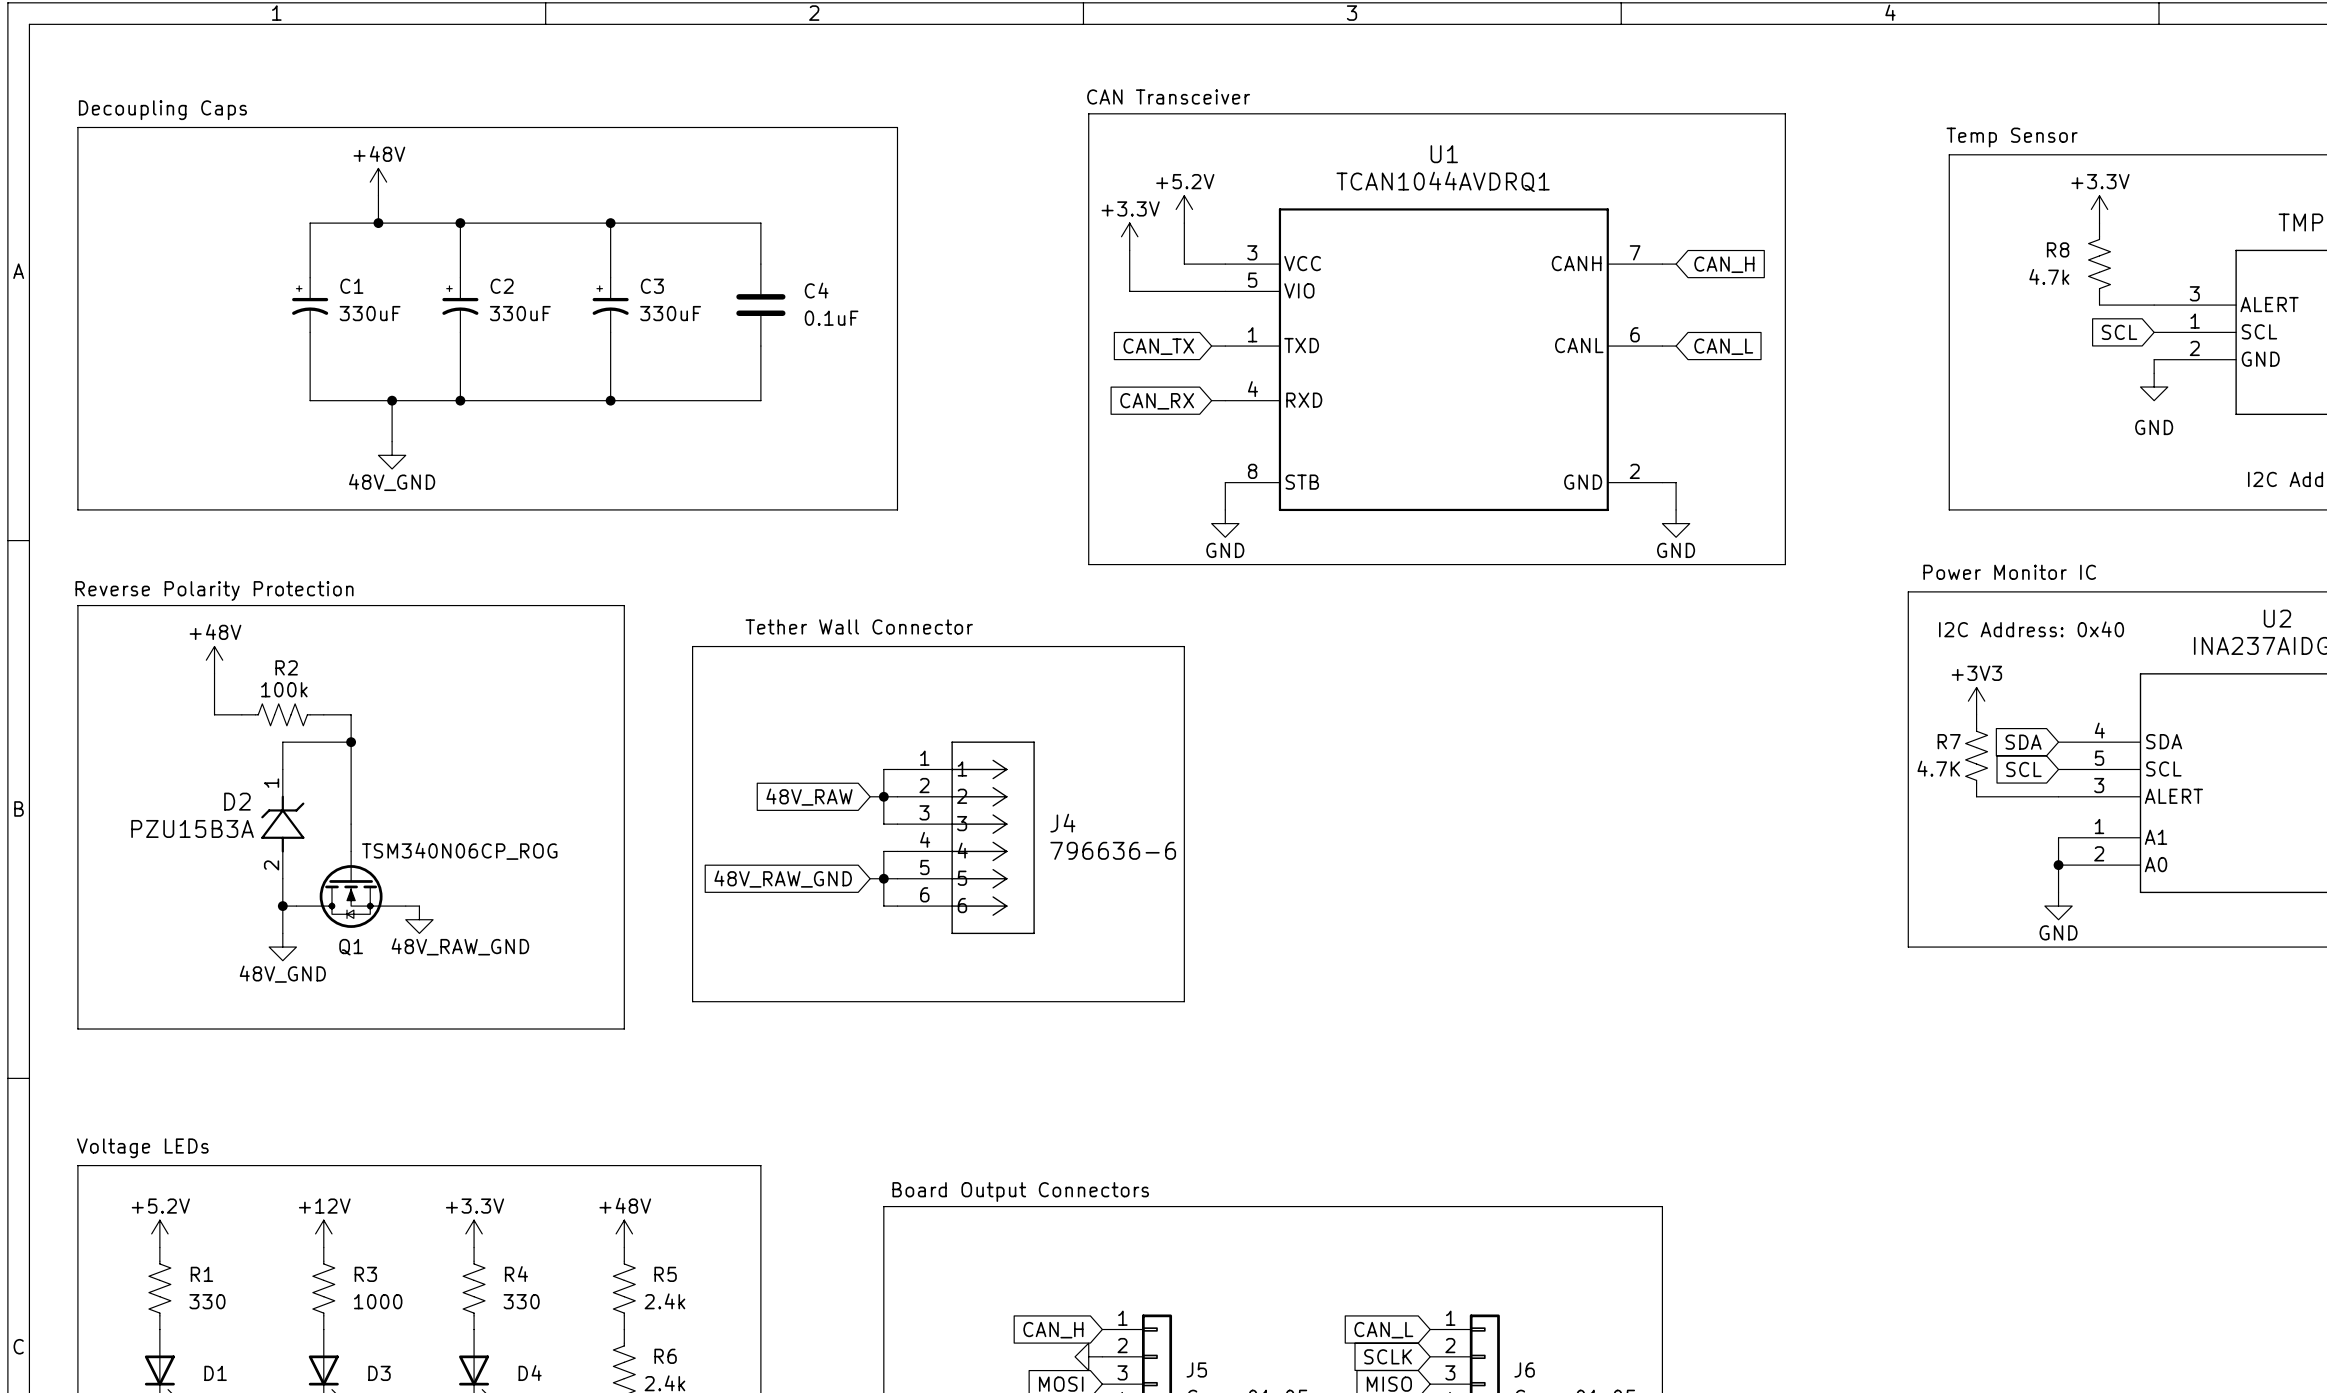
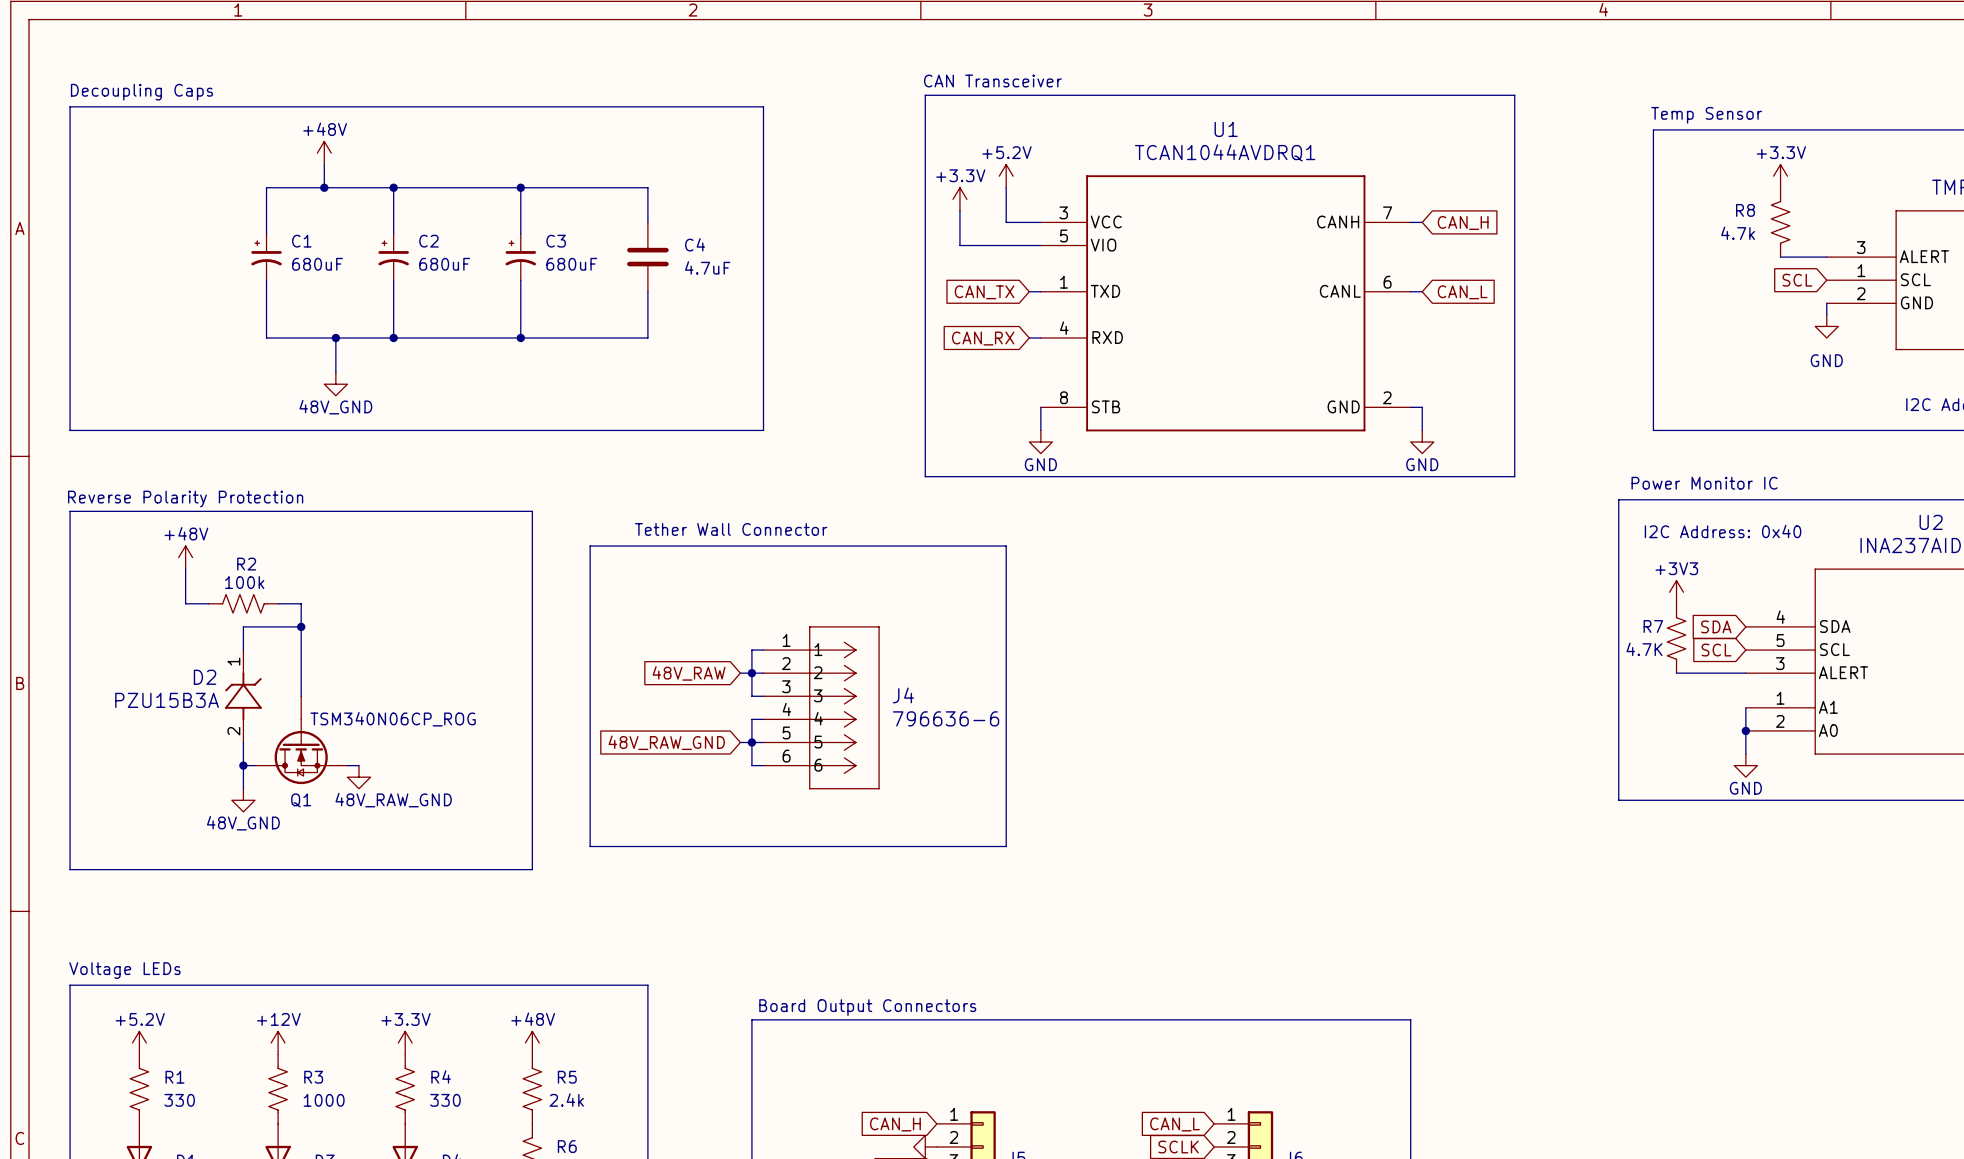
C1 value: 330uF (370, 313) -> 680uF (317, 264)
C2 value: 330uF (520, 313) -> 680uF (444, 264)
C3 value: 330uF (670, 313) -> 680uF (571, 264)
C4 value: 0.1uF (831, 318) -> 4.7uF (707, 267)

